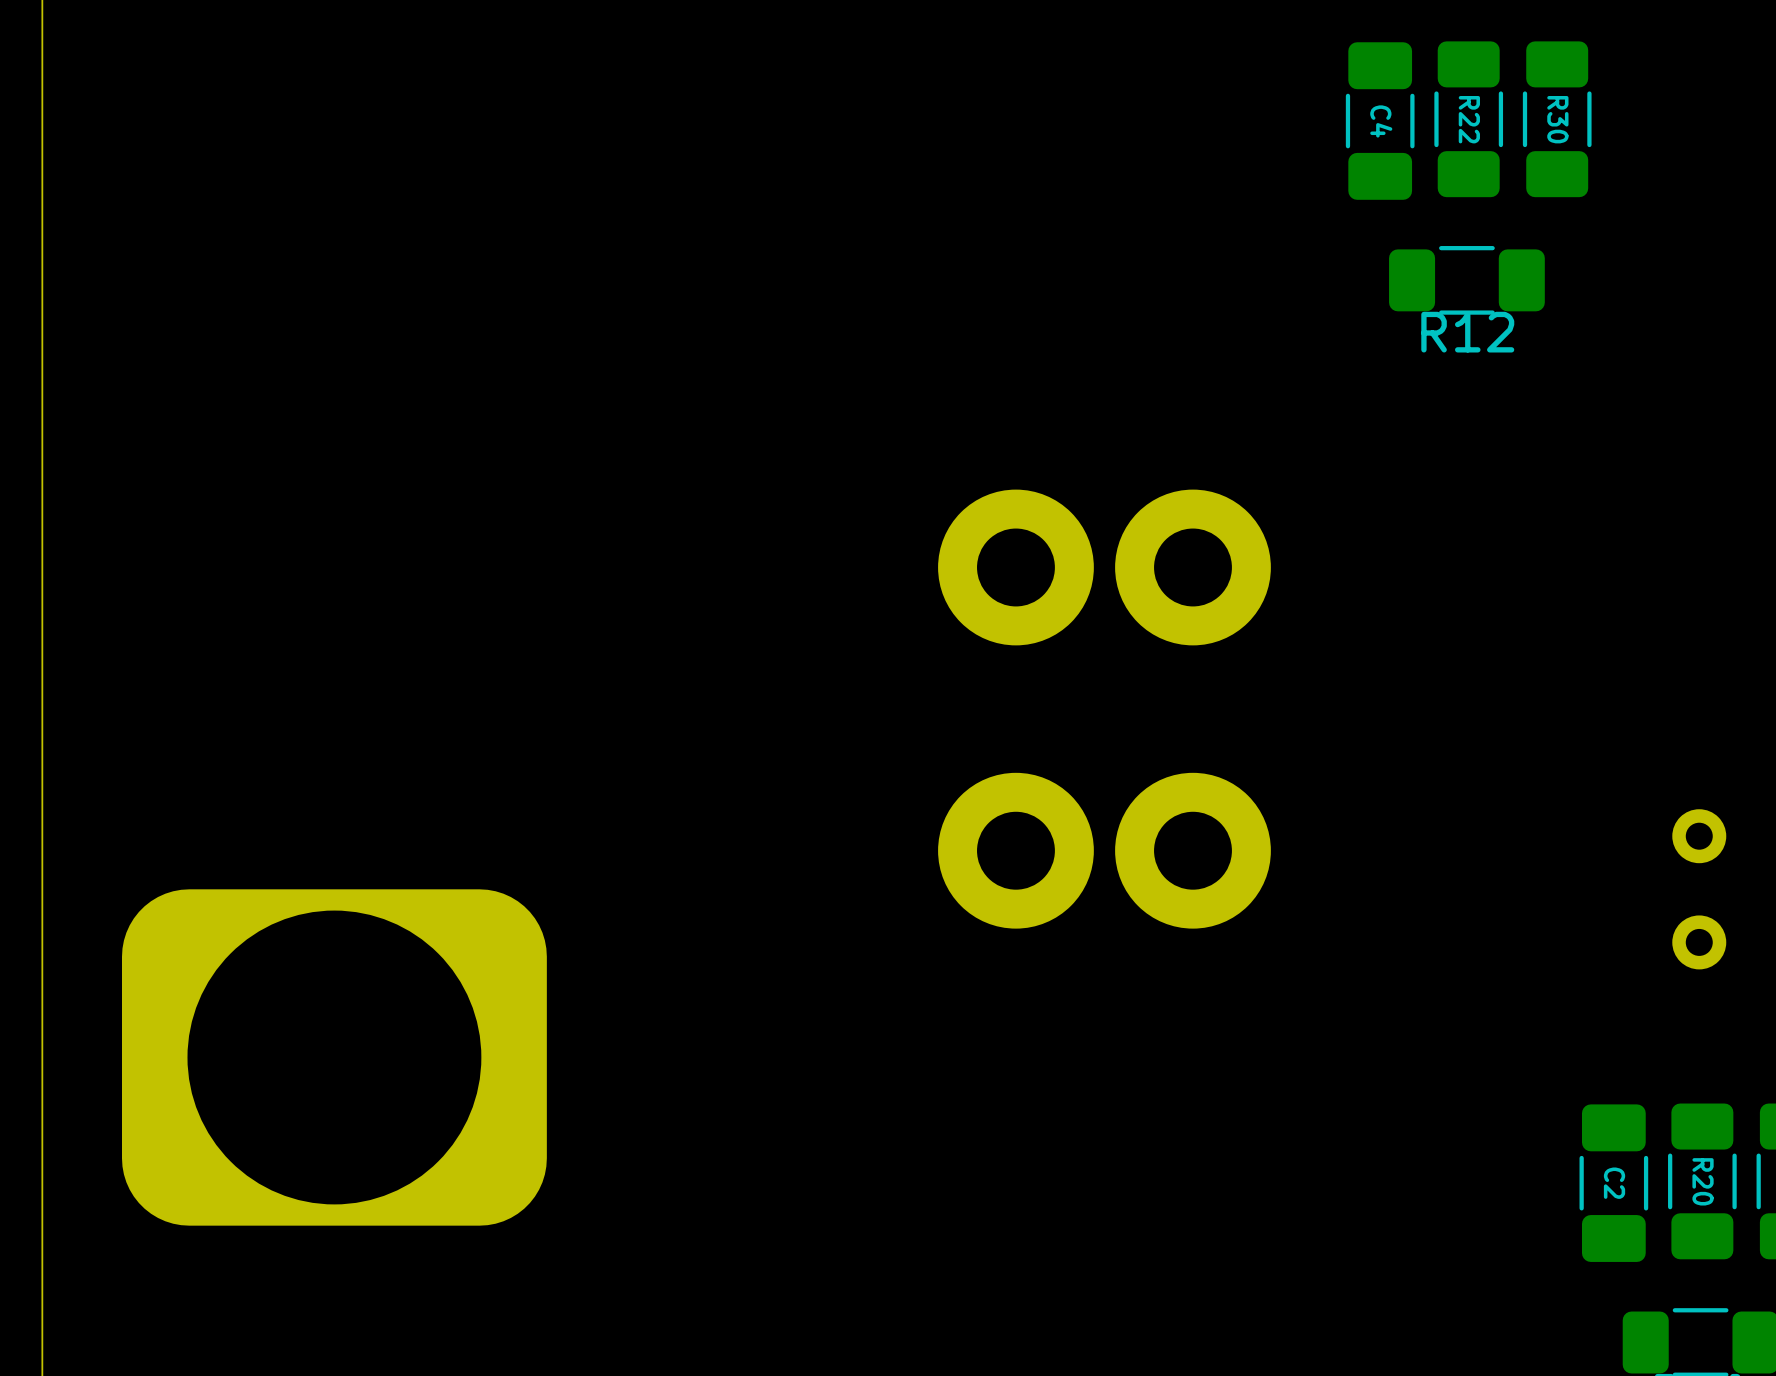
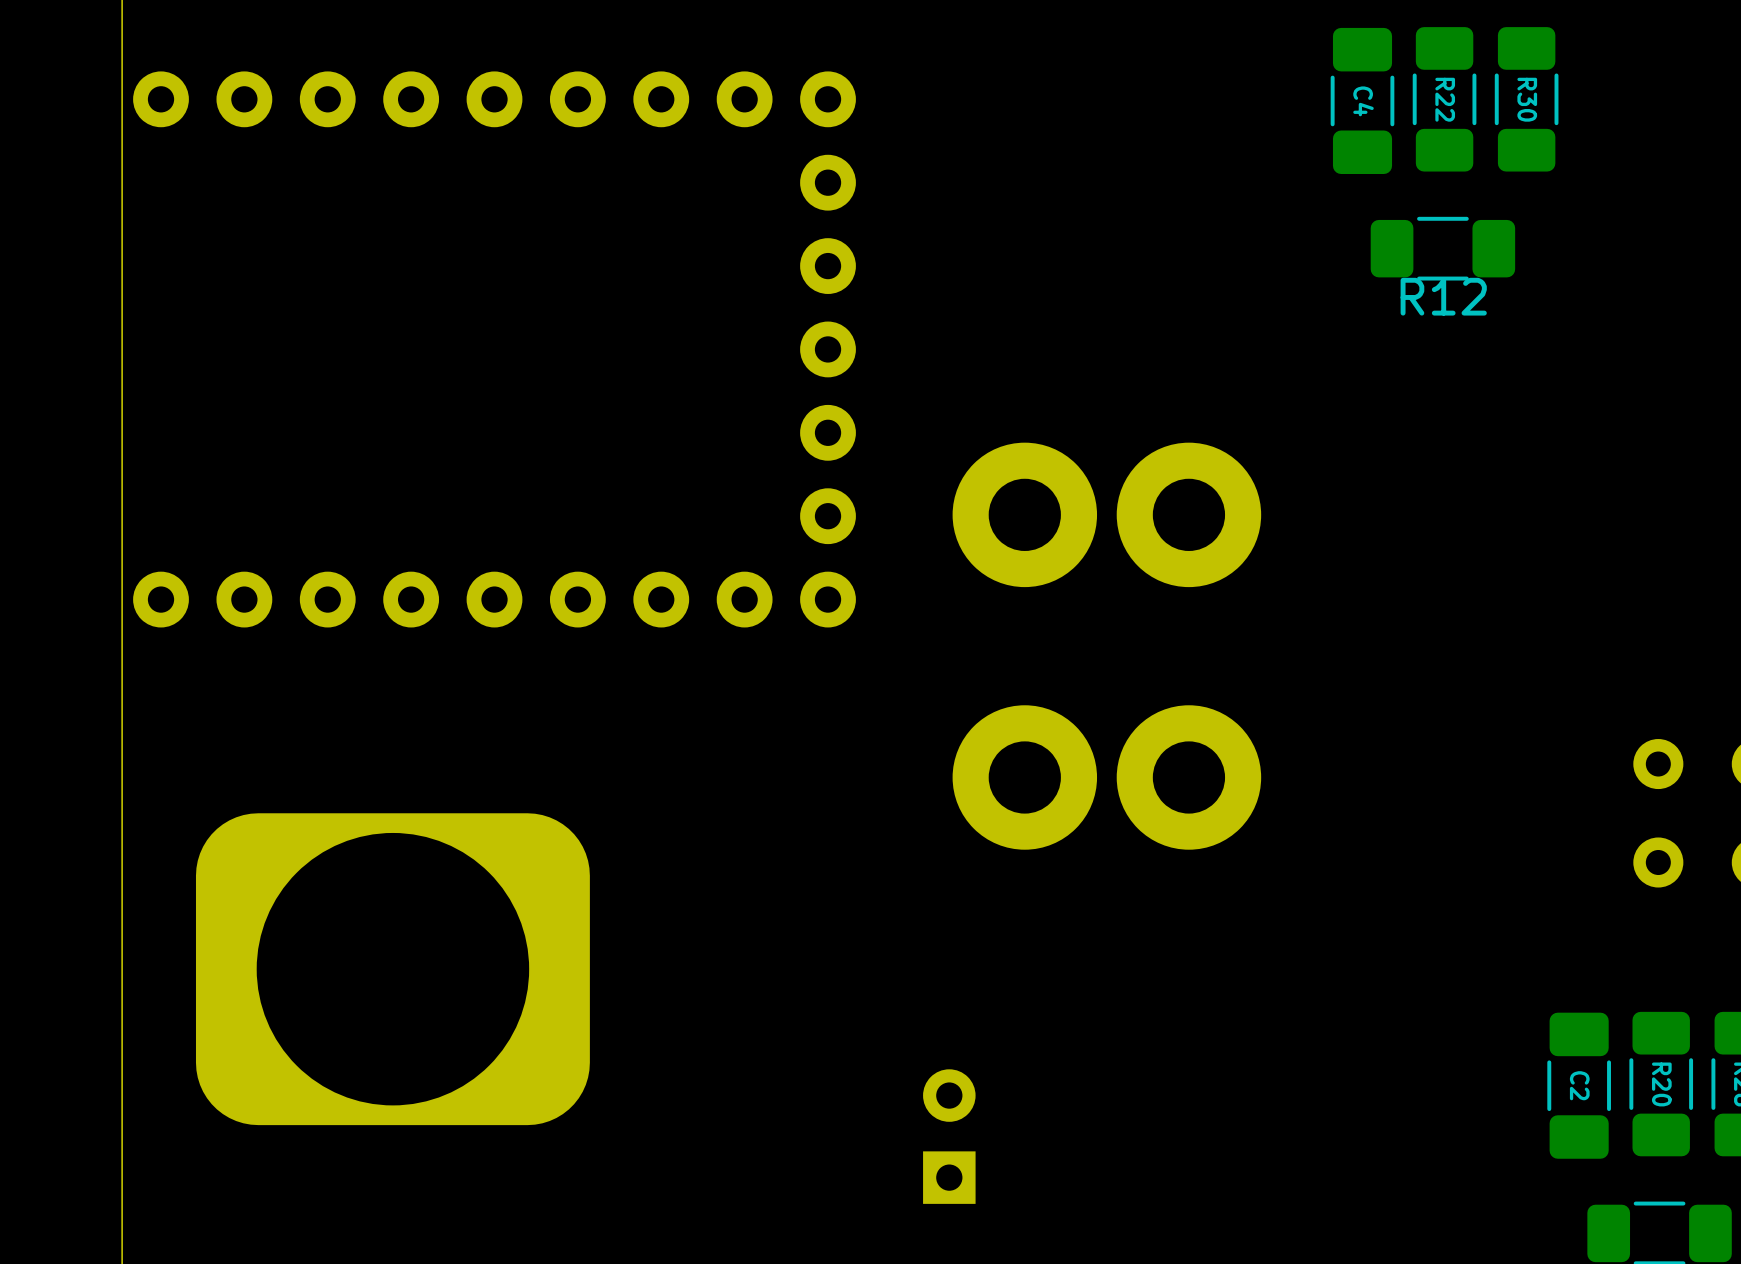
part: none -> (494, 349)
part: none -> (949, 1136)

